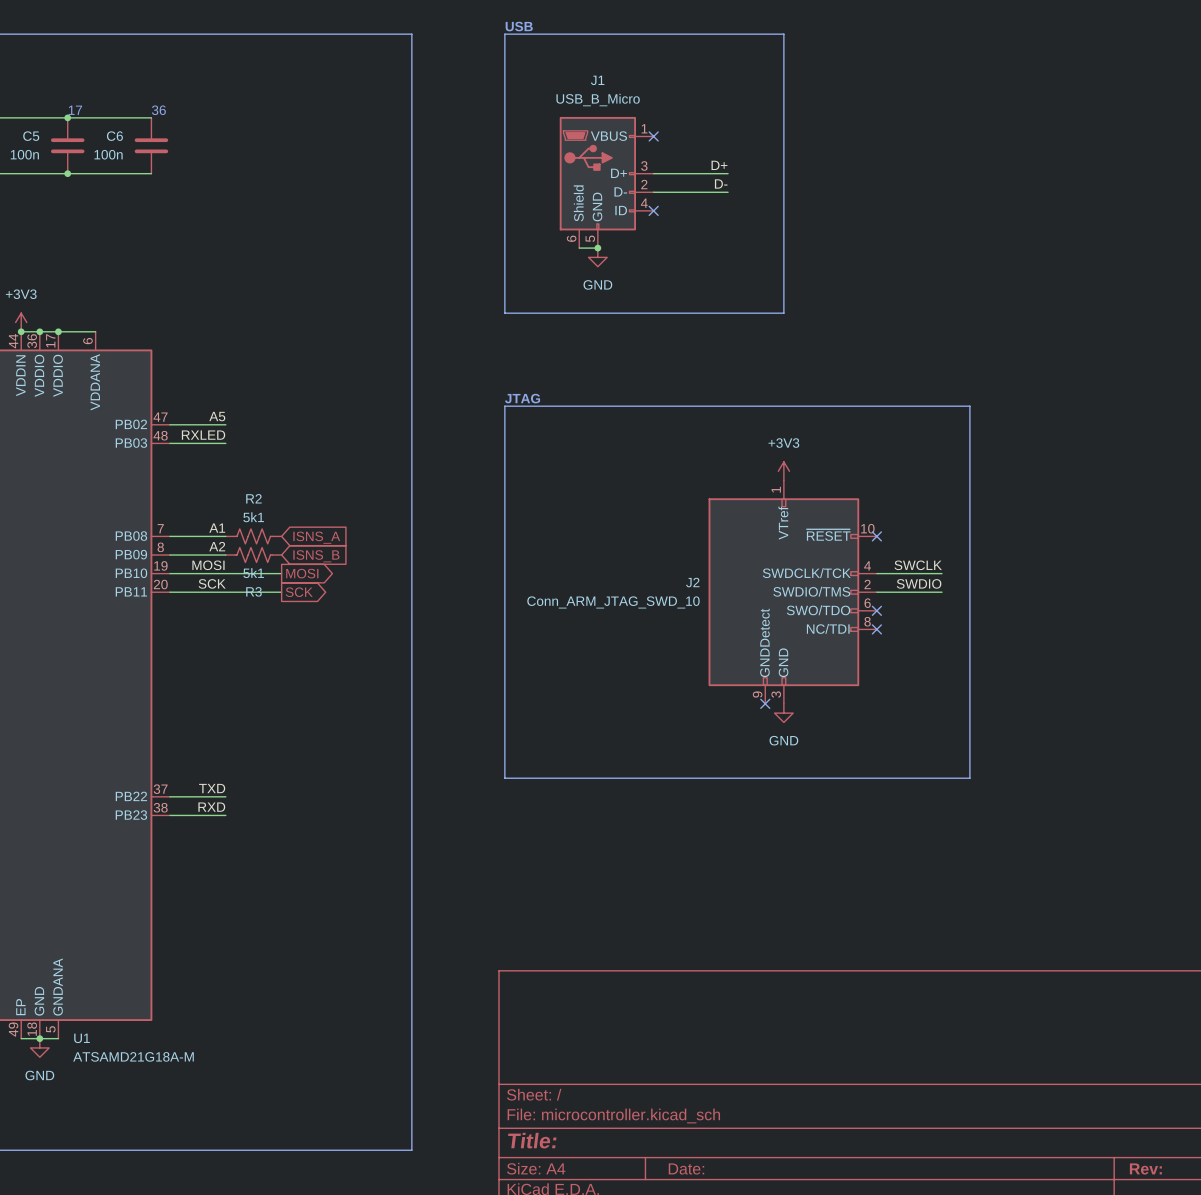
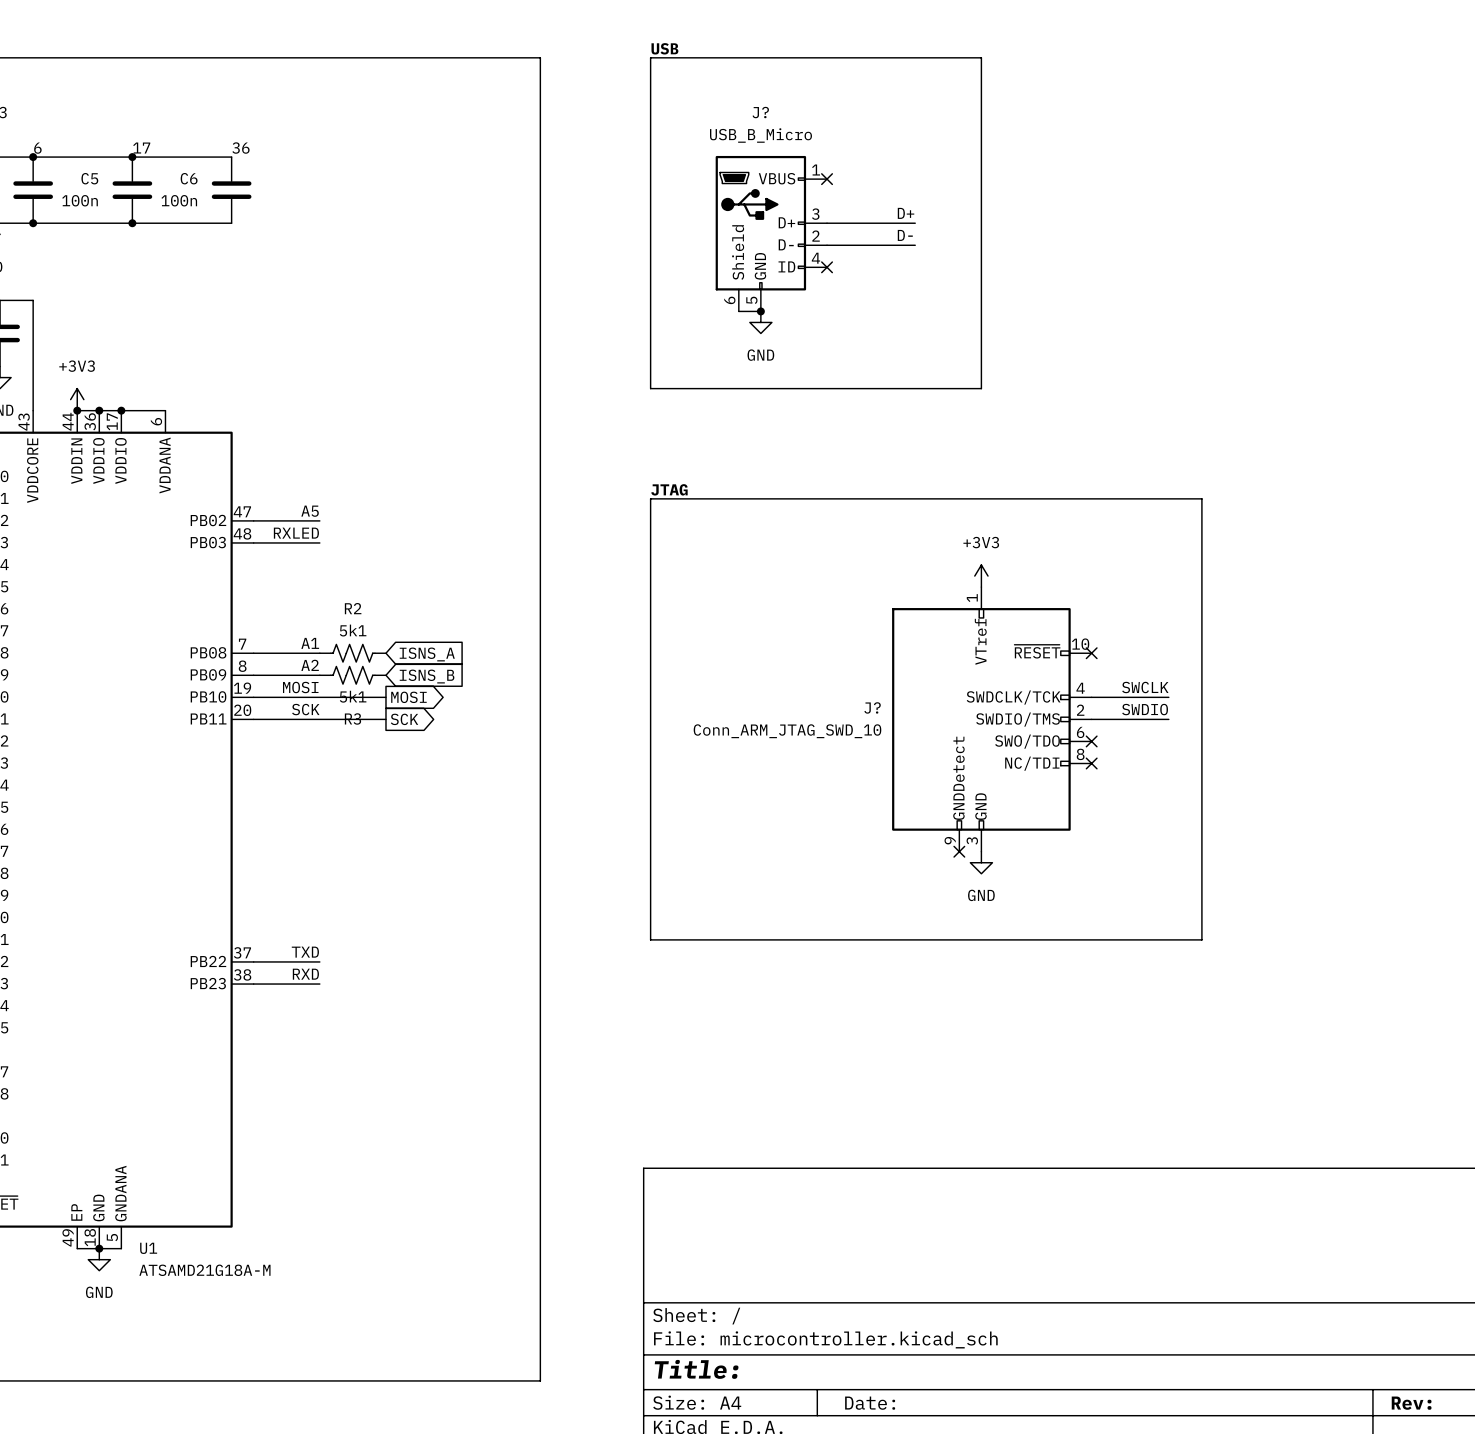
J1 name: J1 (597, 80) -> J? (760, 112)
J2 name: J2 (692, 582) -> J? (872, 707)

